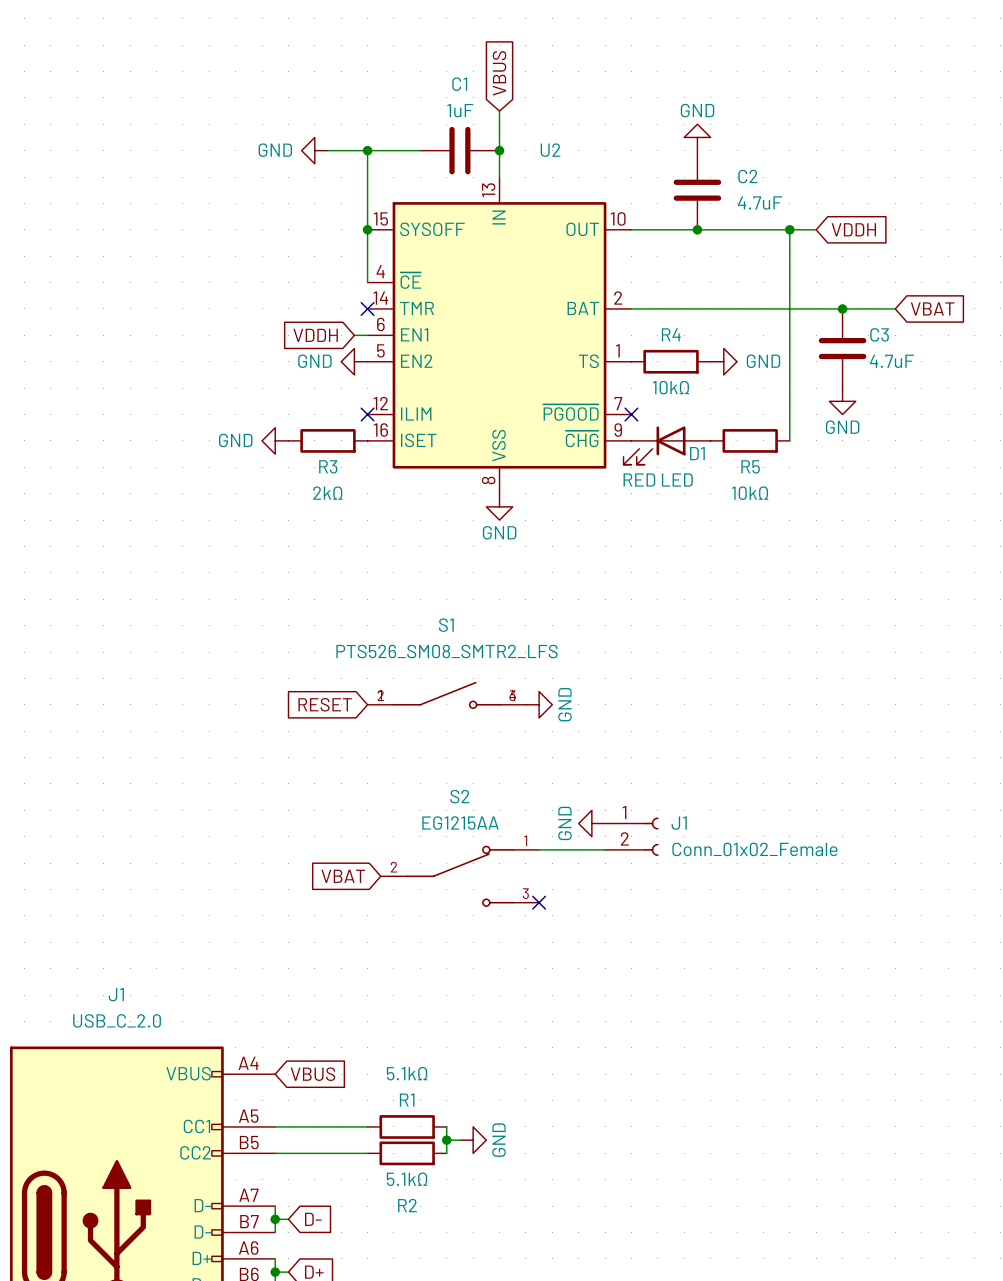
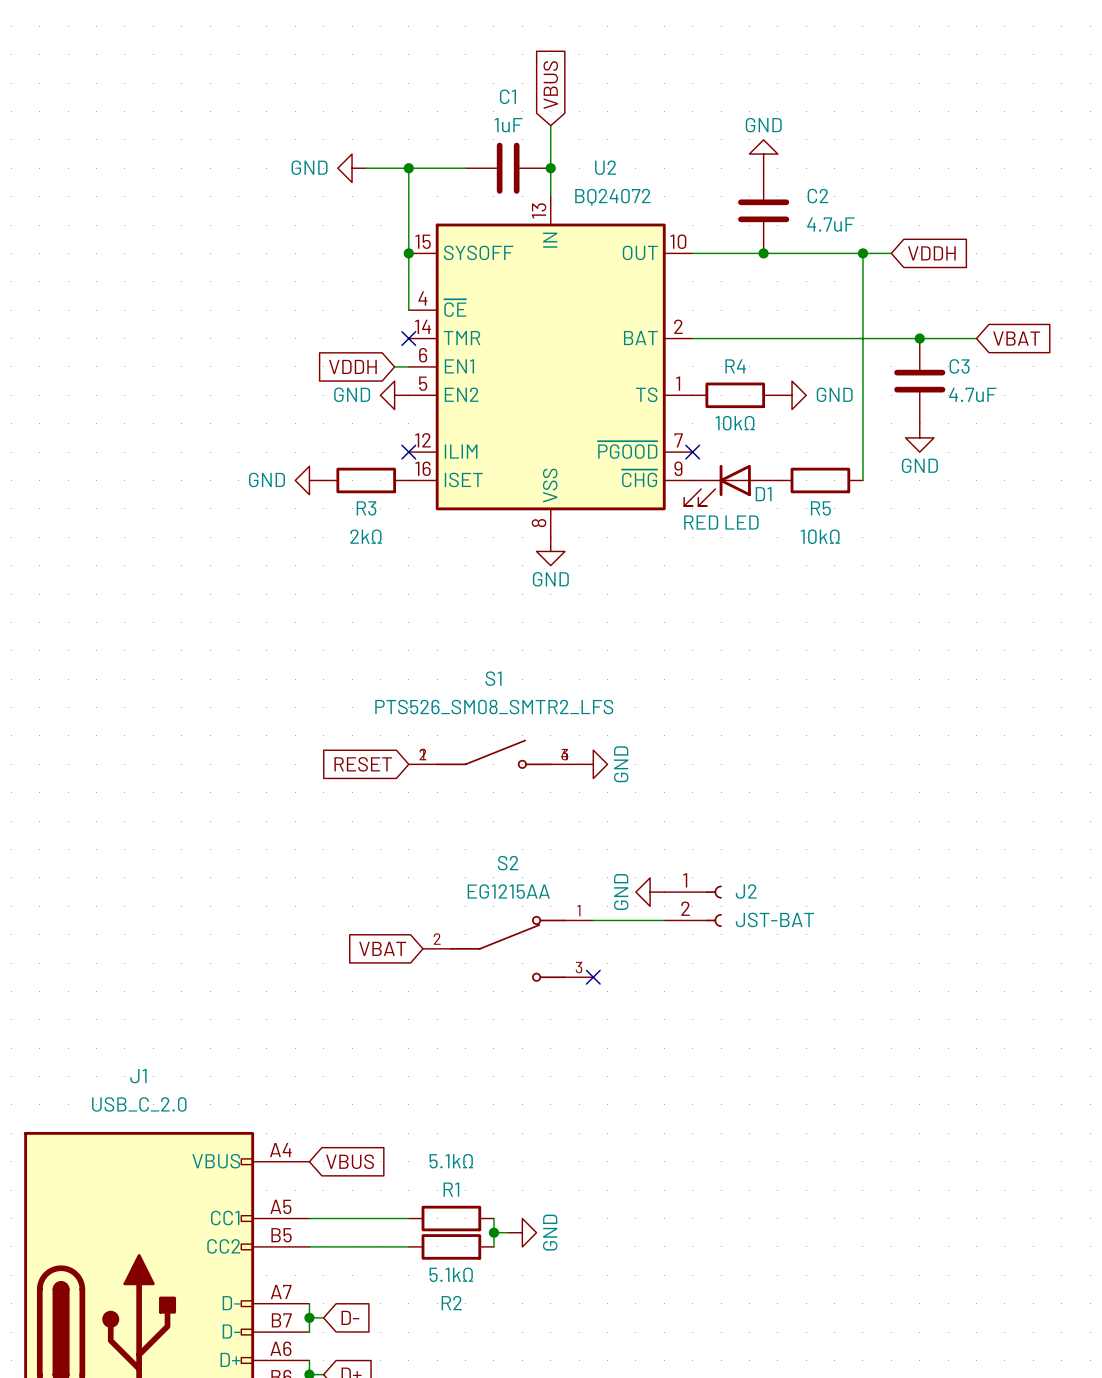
U2 value: none -> BQ24072 (612, 197)
J1 name: J1 (679, 823) -> J2 (746, 891)
J1 value: Conn_01x02_Female (754, 849) -> JST-BAT (774, 919)

